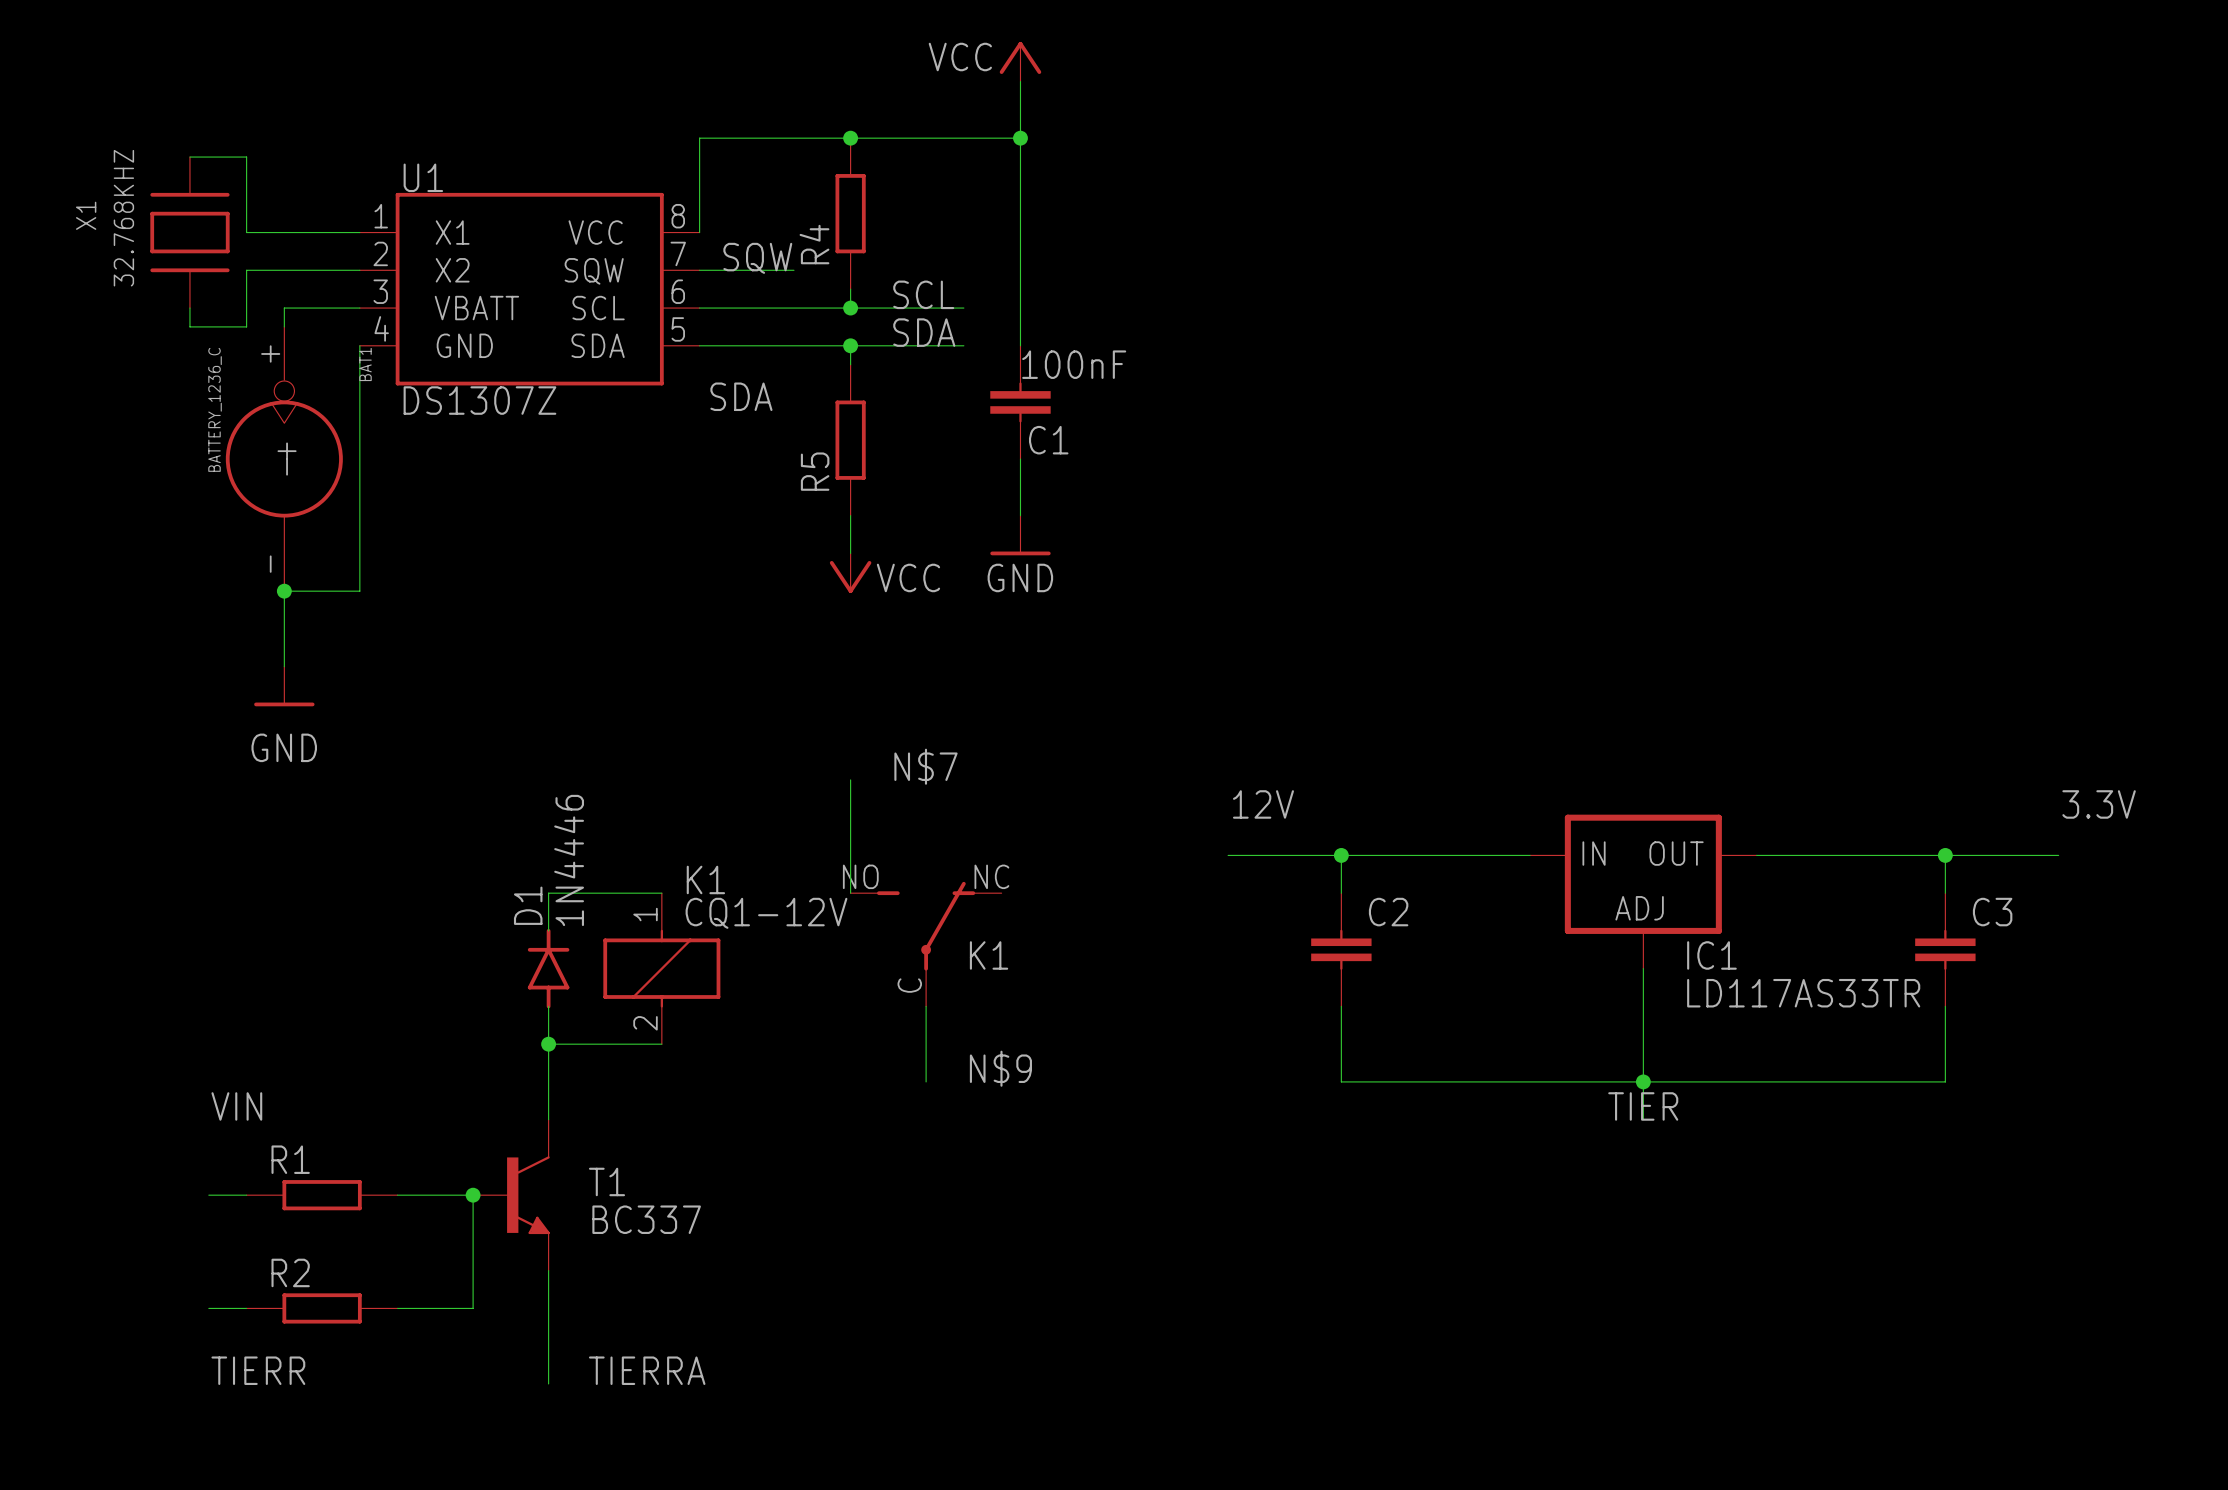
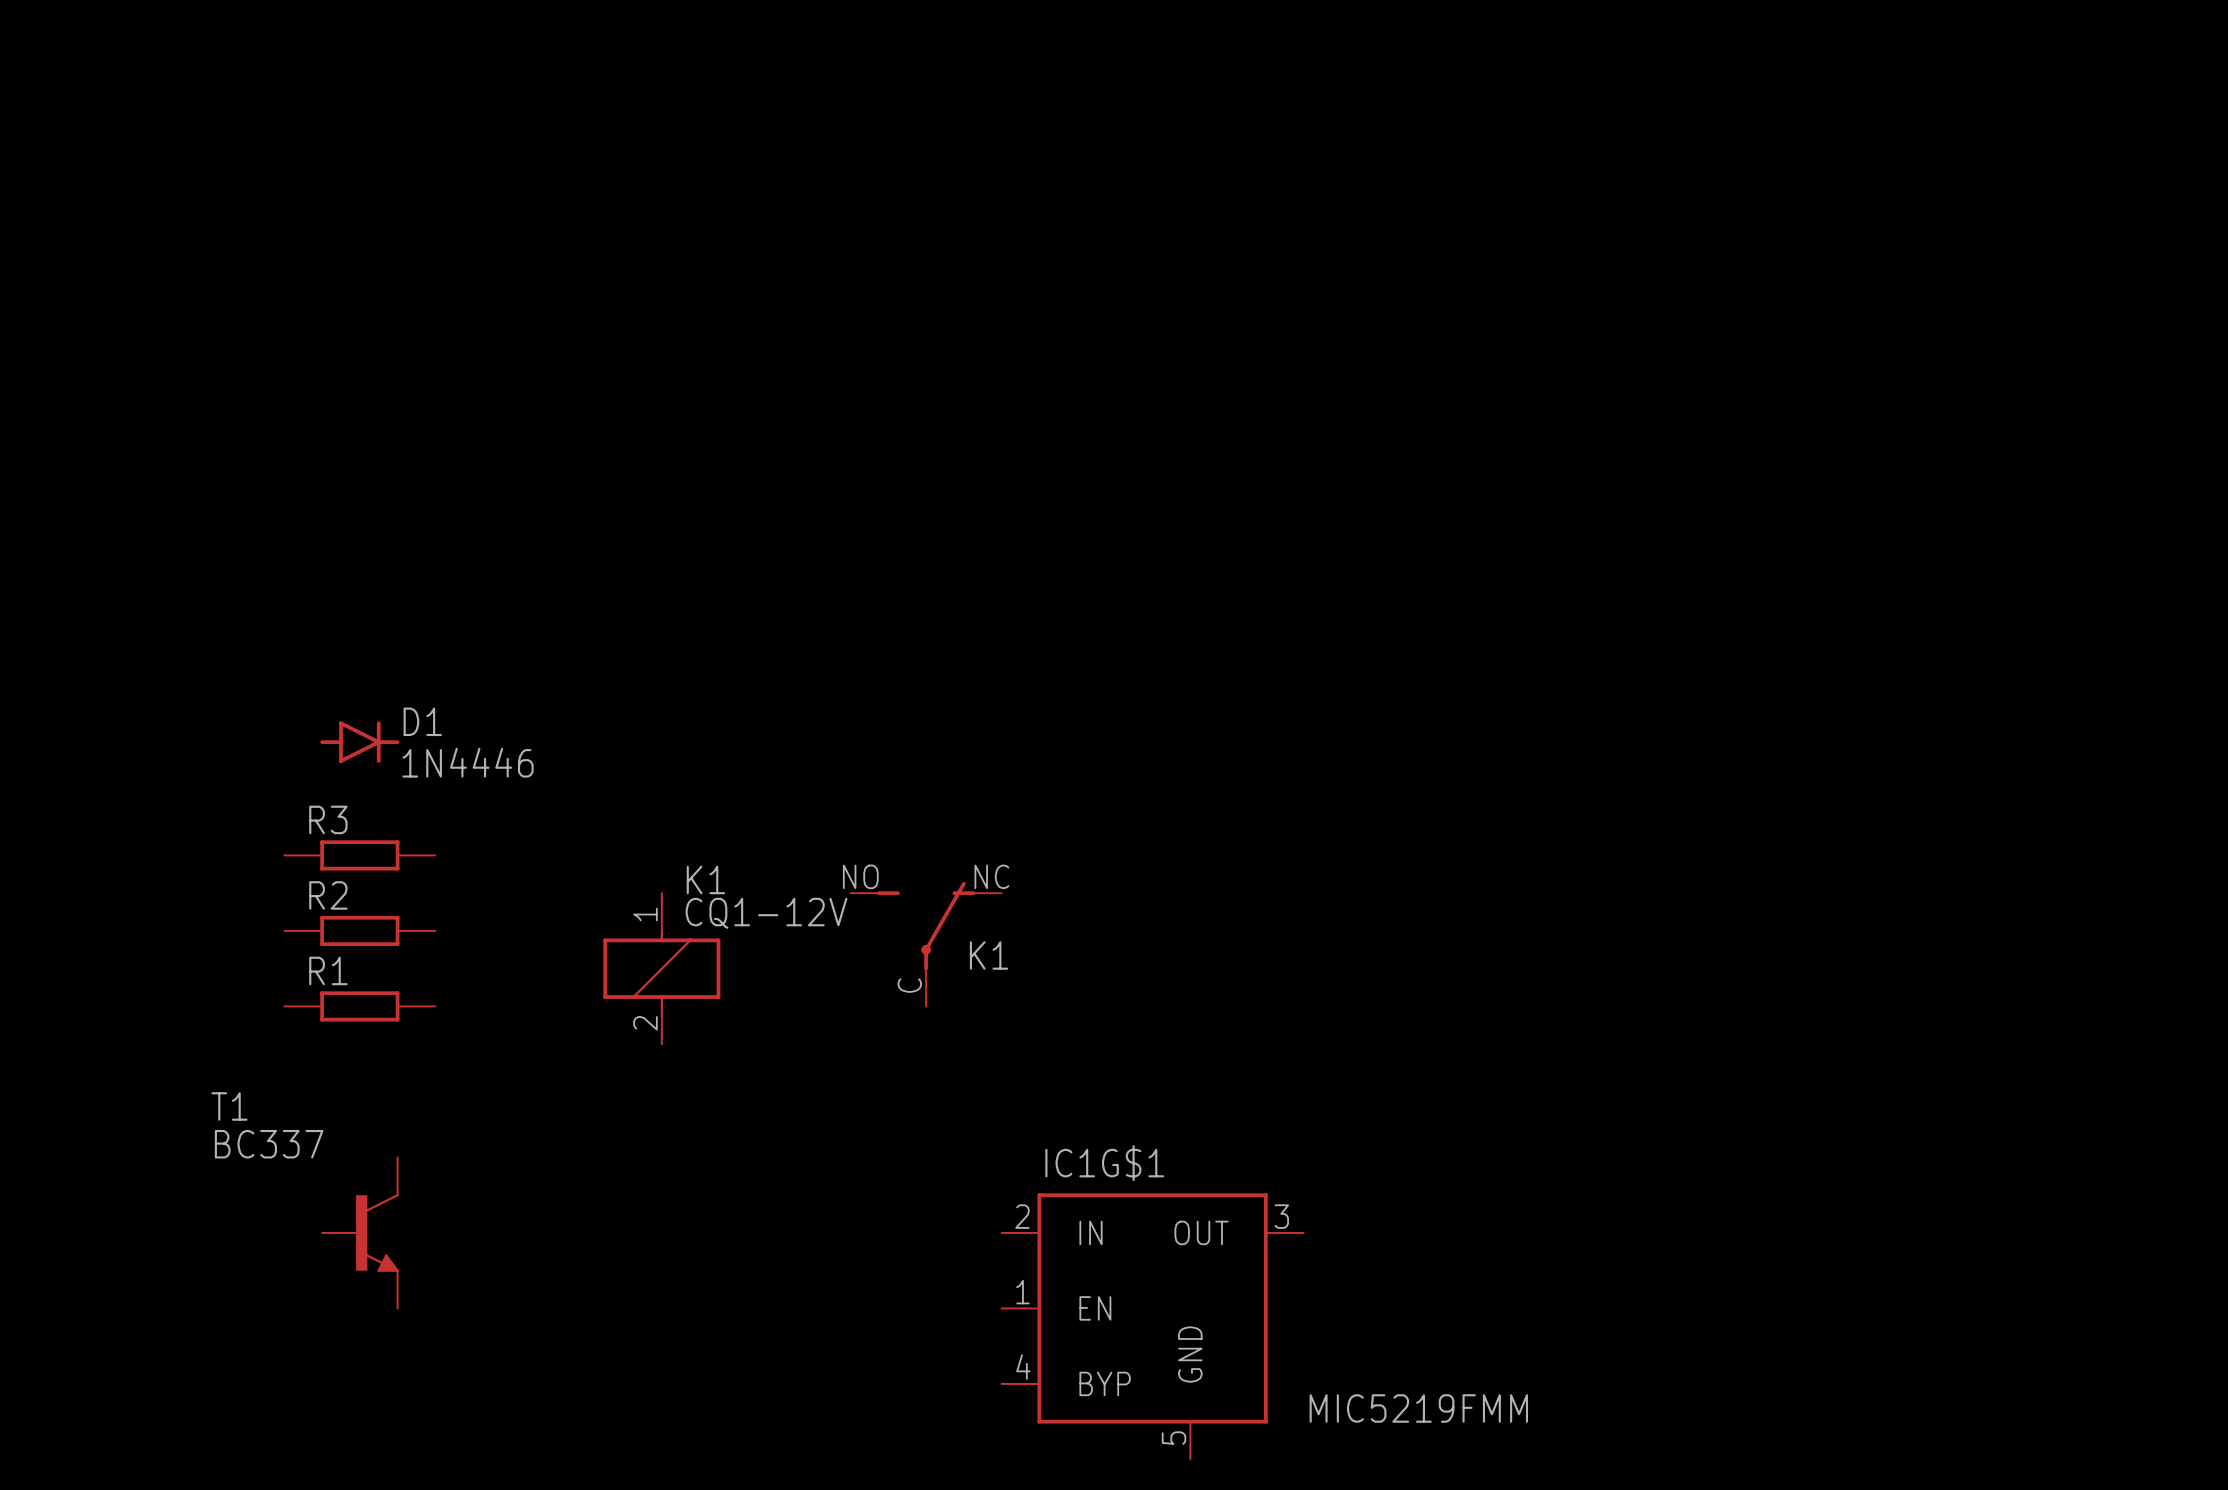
power symbol: VCC (1020, 61) -> none
wire: (1020, 81) (1020, 345) -> none
junction: (850, 138) -> none
wire: (1020, 138) (699, 138) (699, 232) -> none
junction: (1020, 138) -> none
wire: (189, 157) (246, 157) (246, 232) (359, 232) -> none
R4: (850, 213) -> none
X1: 32.768KHZ (189, 232) -> none
label: SQW (757, 258) -> none
wire: (359, 270) (246, 270) (246, 326) (189, 326) (189, 308) -> none
wire: (699, 270) (793, 270) -> none
U1: DS1307Z (529, 289) -> none
wire: (850, 289) (850, 308) -> none
label: SCL (923, 294) -> none
wire: (359, 308) (284, 308) (284, 326) -> none
wire: (699, 308) (963, 308) -> none
junction: (850, 308) -> none
label: SDA (924, 332) -> none
wire: (359, 345) (359, 591) (284, 591) (284, 666) -> none
wire: (699, 345) (963, 345) -> none
wire: (850, 345) (850, 364) -> none
junction: (850, 345) -> none
label: SDA (741, 396) -> none
C1: 100nF (1020, 402) -> none
R5: (850, 440) -> none
BAT1: BATTERY_1236_C (284, 459) -> none
wire: (1020, 459) (1020, 515) -> none
wire: (850, 515) (850, 553) -> none
power symbol: GND (1020, 535) -> none
power symbol: VCC (850, 573) -> none
junction: (284, 591) -> none
power symbol: GND (284, 686) -> none
label: N$7 (925, 766) -> none
wire: (850, 779) (850, 893) -> none
label: 12V (1263, 804) -> none
label: 3.3V (2099, 804) -> none
R3: none -> (359, 855)
wire: (1228, 855) (1530, 855) -> none
wire: (1341, 855) (1341, 893) -> none
junction: (1341, 855) -> none
wire: (1756, 855) (2058, 855) -> none
wire: (1945, 855) (1945, 893) -> none
junction: (1945, 855) -> none
IC1: LD117AS33TR (1643, 891) -> none
wire: (661, 893) (548, 893) (548, 930) -> none
C2: (1341, 949) -> none
C3: (1945, 949) -> none
D1 rotation: 0° (548, 968) -> 90° clockwise (359, 742)
D1 position: (548, 968) -> (359, 742)
wire: (1643, 968) (1643, 1119) -> none
wire: (548, 1006) (548, 1119) -> none
wire: (926, 1006) (926, 1081) -> none
wire: (1341, 1006) (1341, 1081) (1945, 1081) (1945, 1006) -> none
wire: (548, 1044) (661, 1044) -> none
junction: (548, 1044) -> none
label: N$9 (1000, 1068) -> none
junction: (1643, 1081) -> none
label: VIN (236, 1106) -> none
label: TIER (1643, 1106) -> none
T1 name position: T1 (606, 1181) -> T1 (229, 1106)
wire: (208, 1195) (246, 1195) -> none
R1 position: (322, 1195) -> (359, 1006)
wire: (397, 1195) (473, 1195) (473, 1308) (397, 1308) -> none
junction: (473, 1195) -> none
T1 position: (511, 1195) -> (360, 1232)
T1 value position: BC337 (646, 1219) -> BC337 (269, 1144)
wire: (548, 1270) (548, 1383) -> none
wire: (208, 1308) (246, 1308) -> none
R2 position: (322, 1308) -> (359, 930)
IC1G$1: none -> MIC5219FMM (1152, 1326)
label: TIERR (258, 1370) -> none
label: TIERRA (647, 1370) -> none

